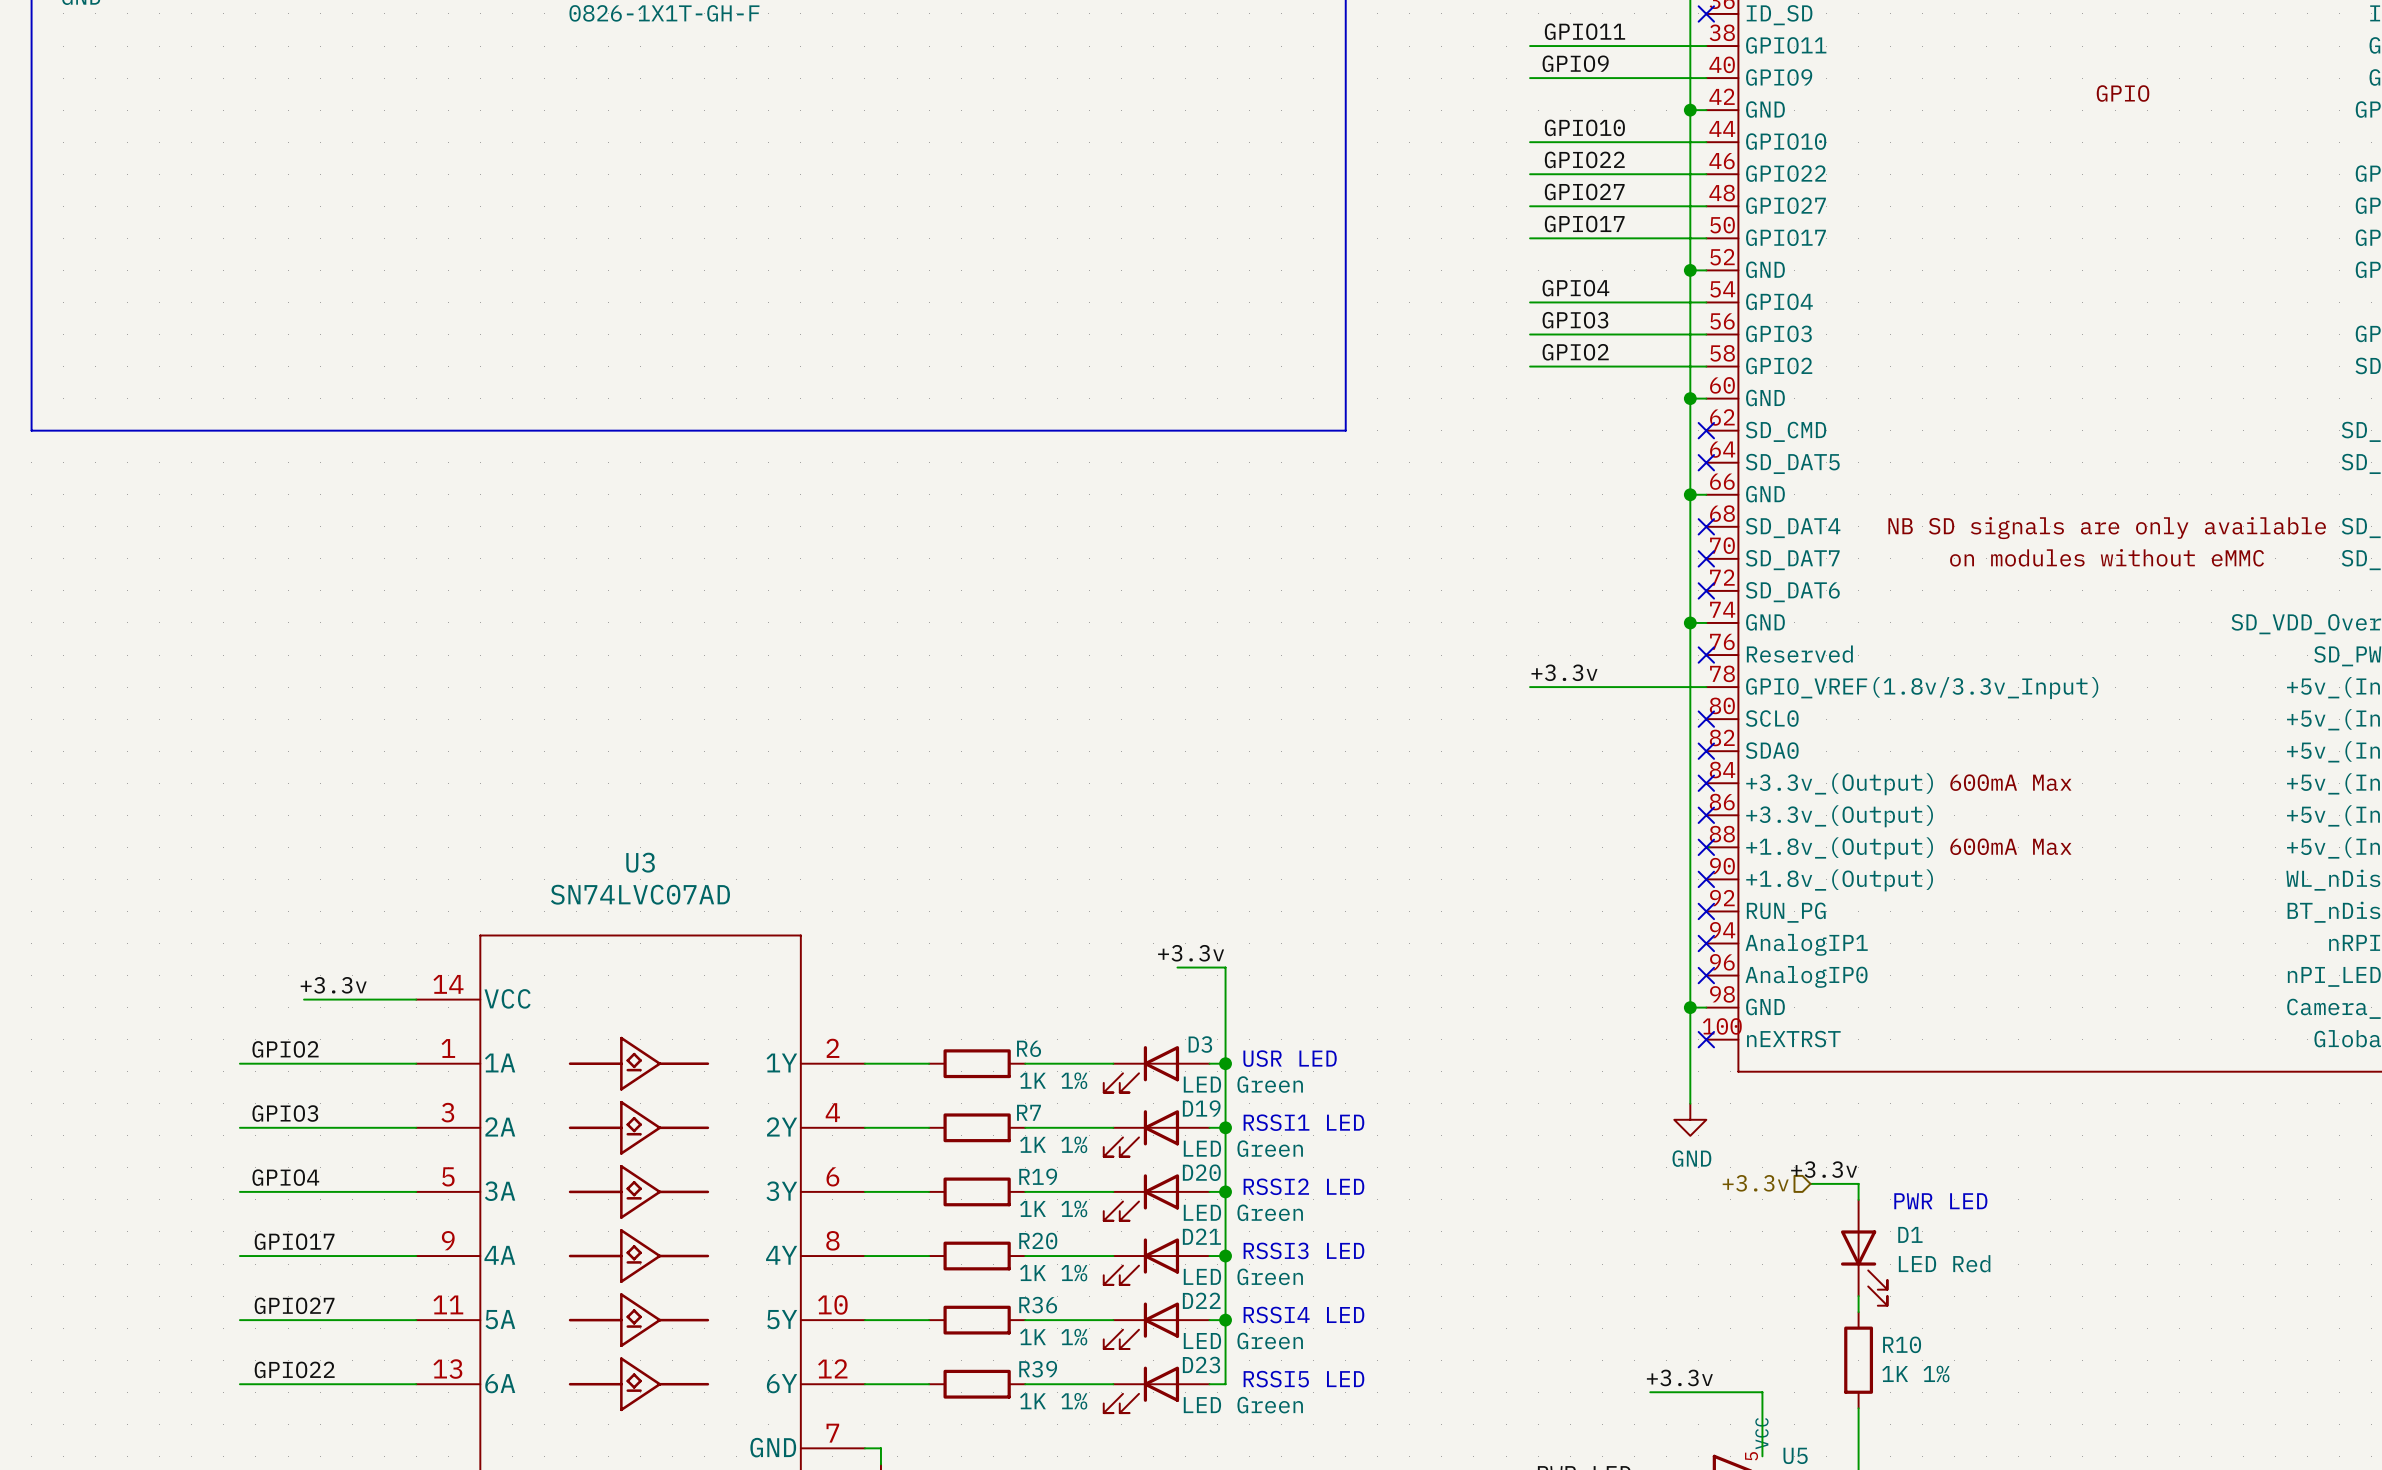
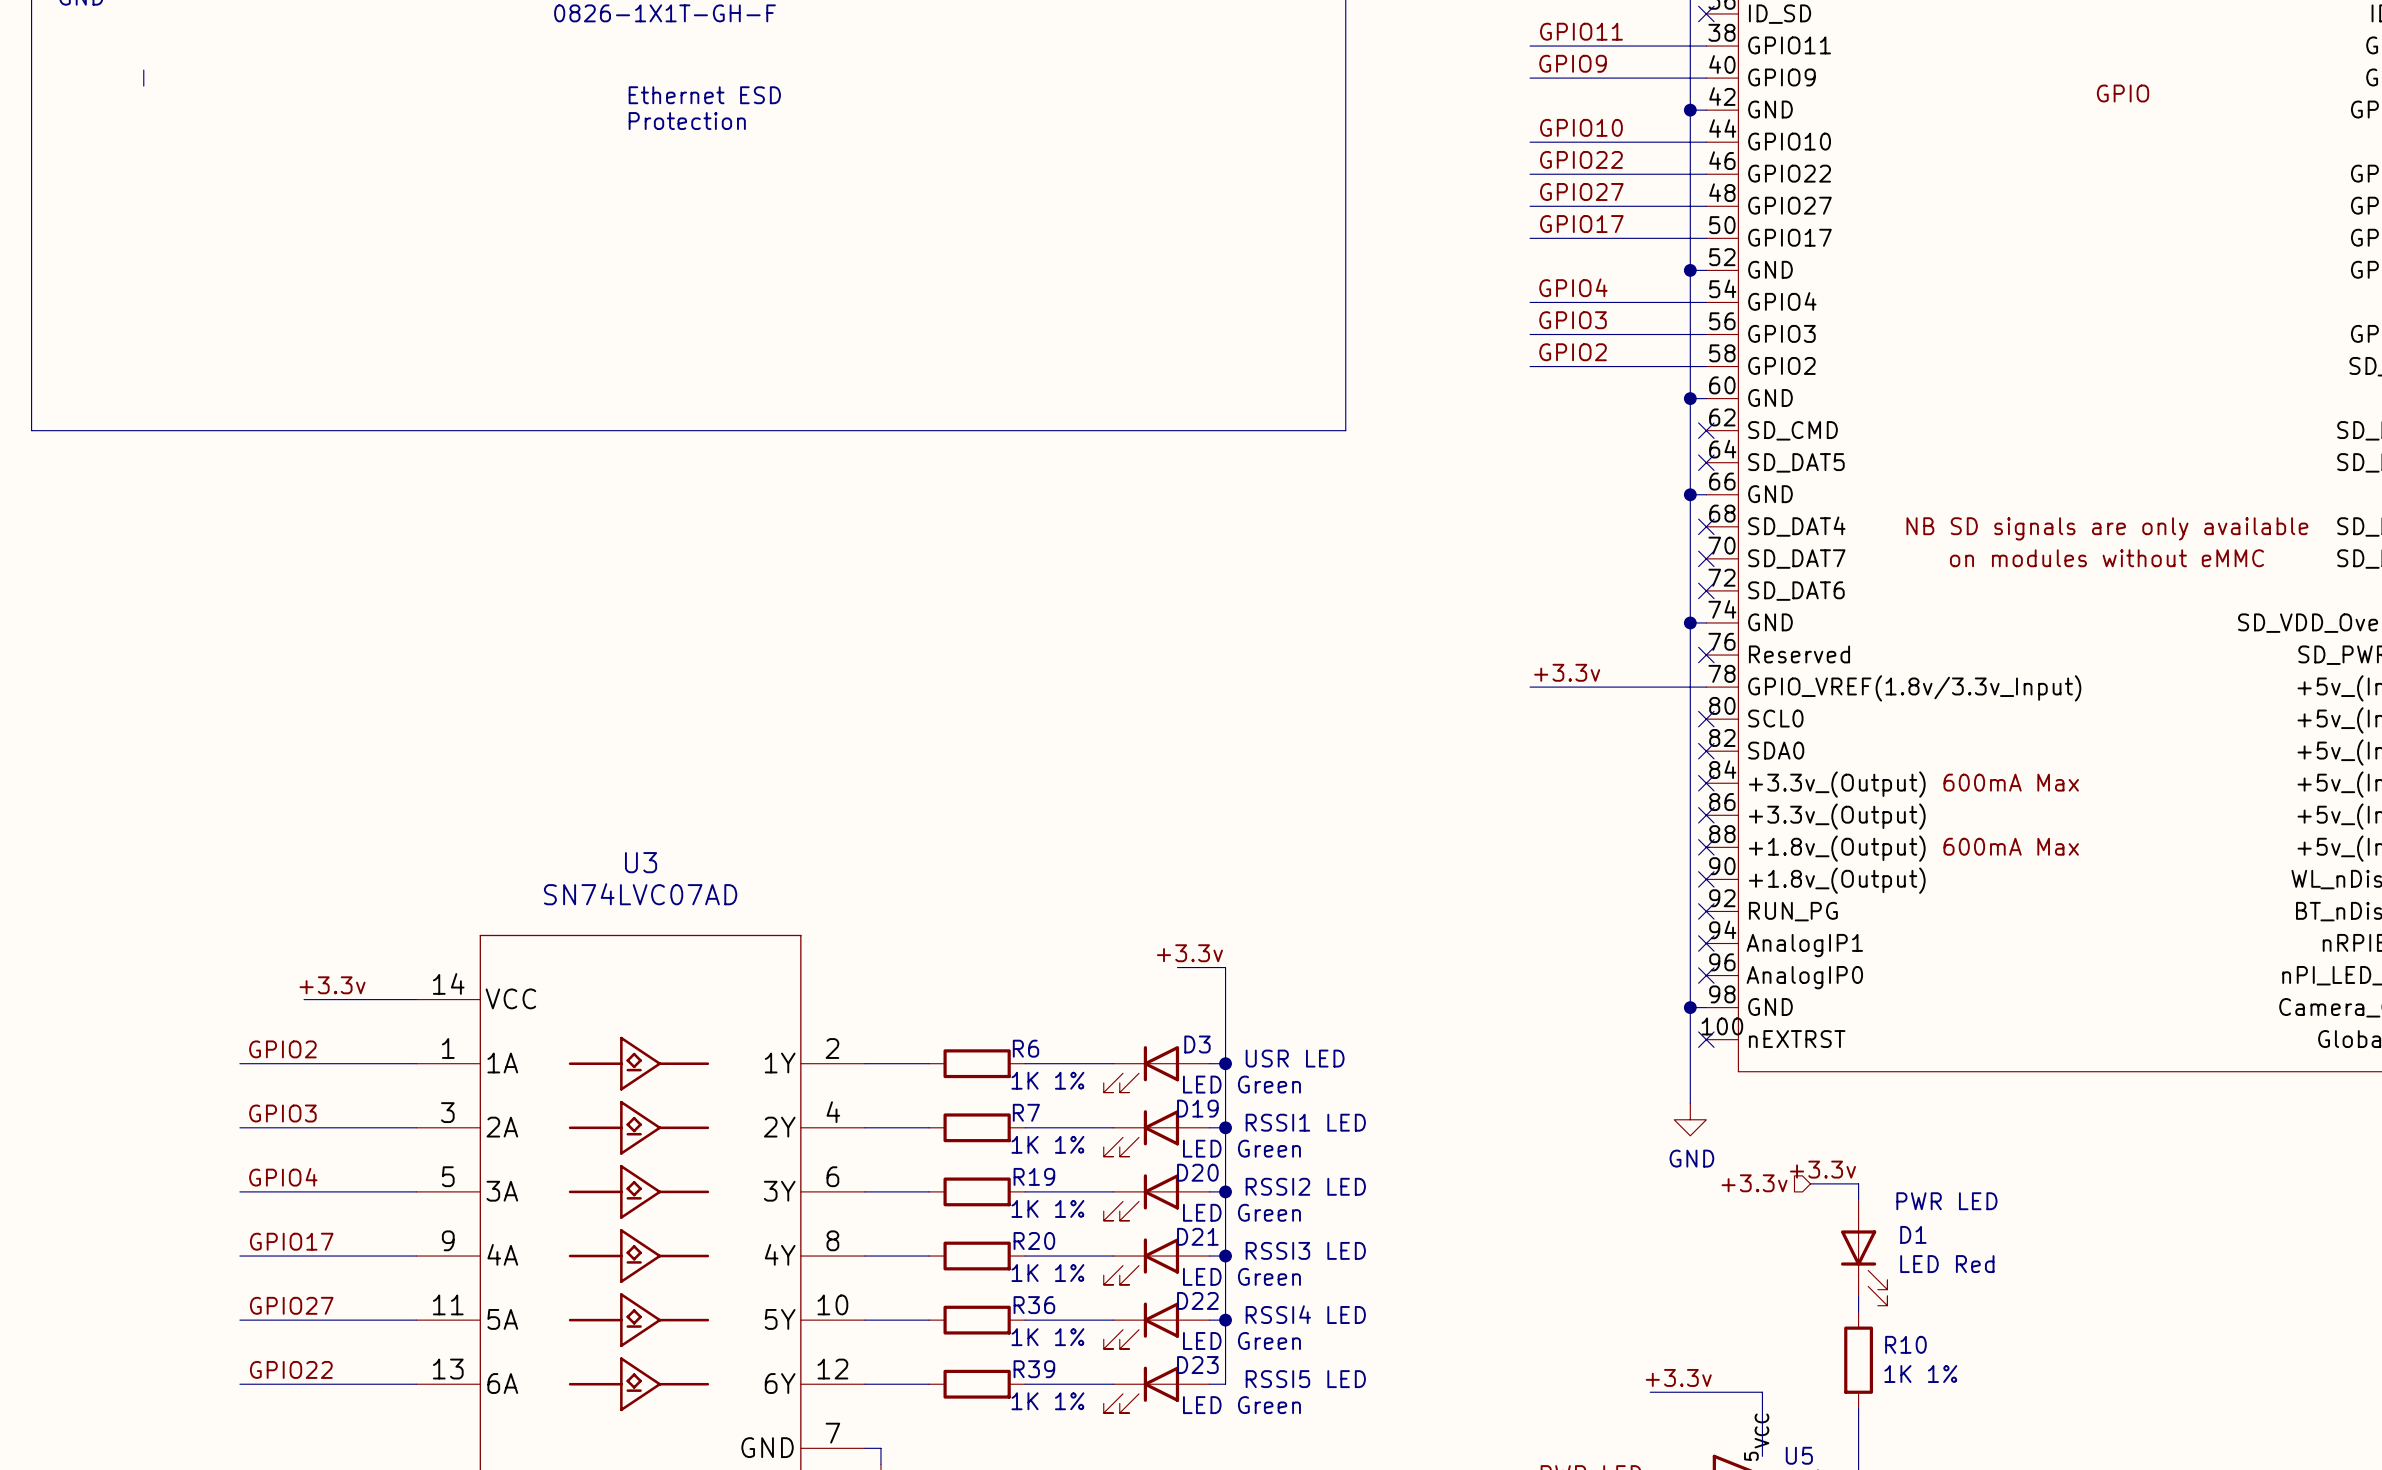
wire: none -> (143, 70) (143, 86)
text: none -> Ethernet ESD (704, 95)
text: none -> Protection (687, 121)

